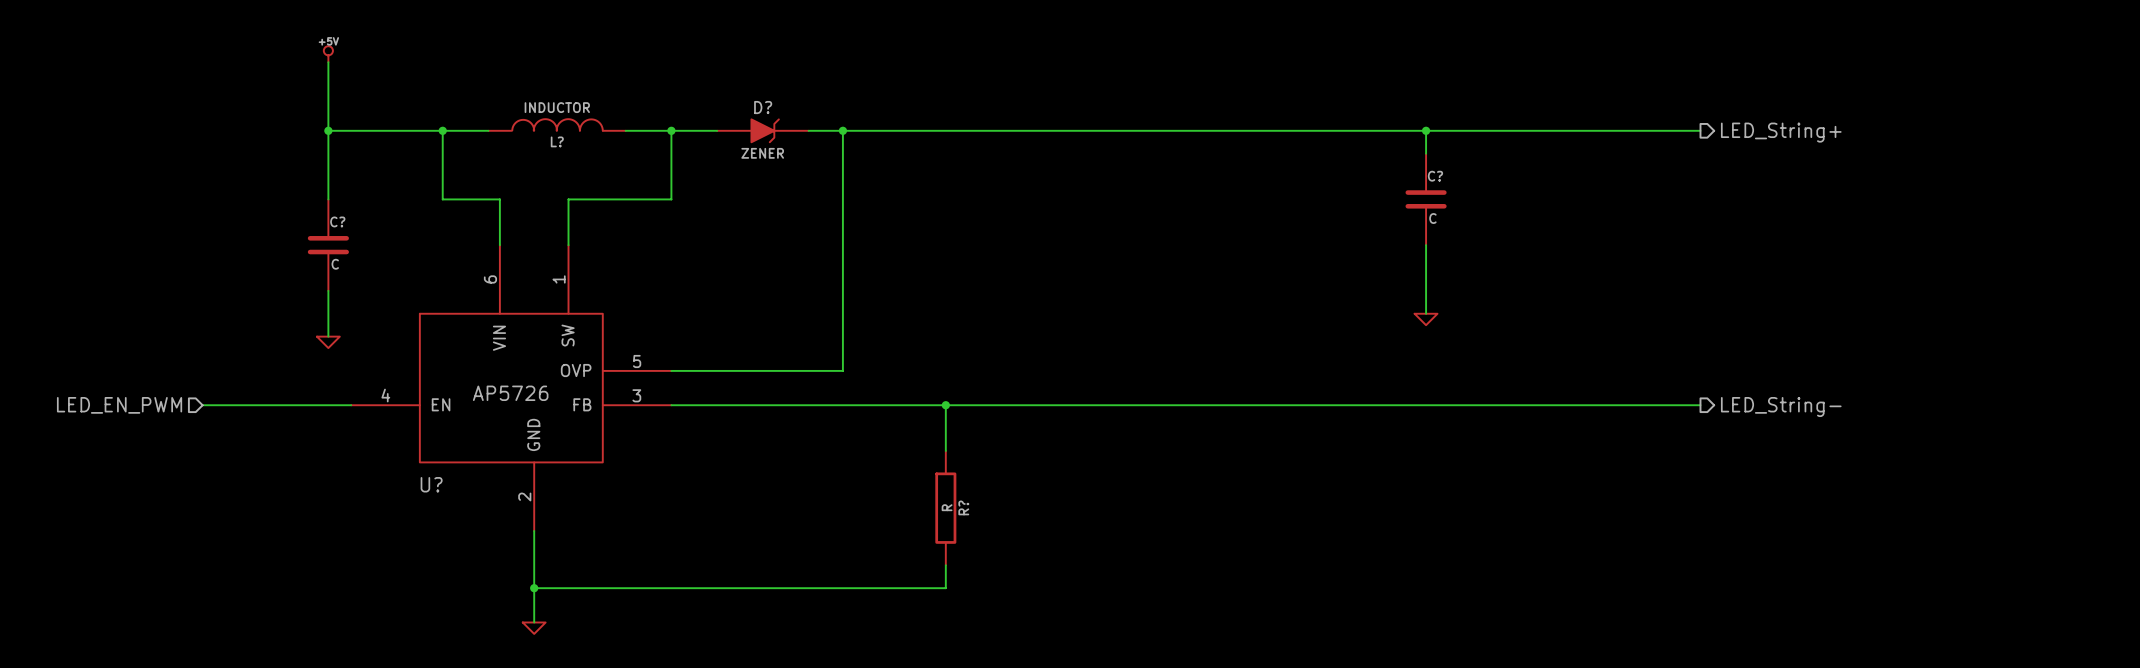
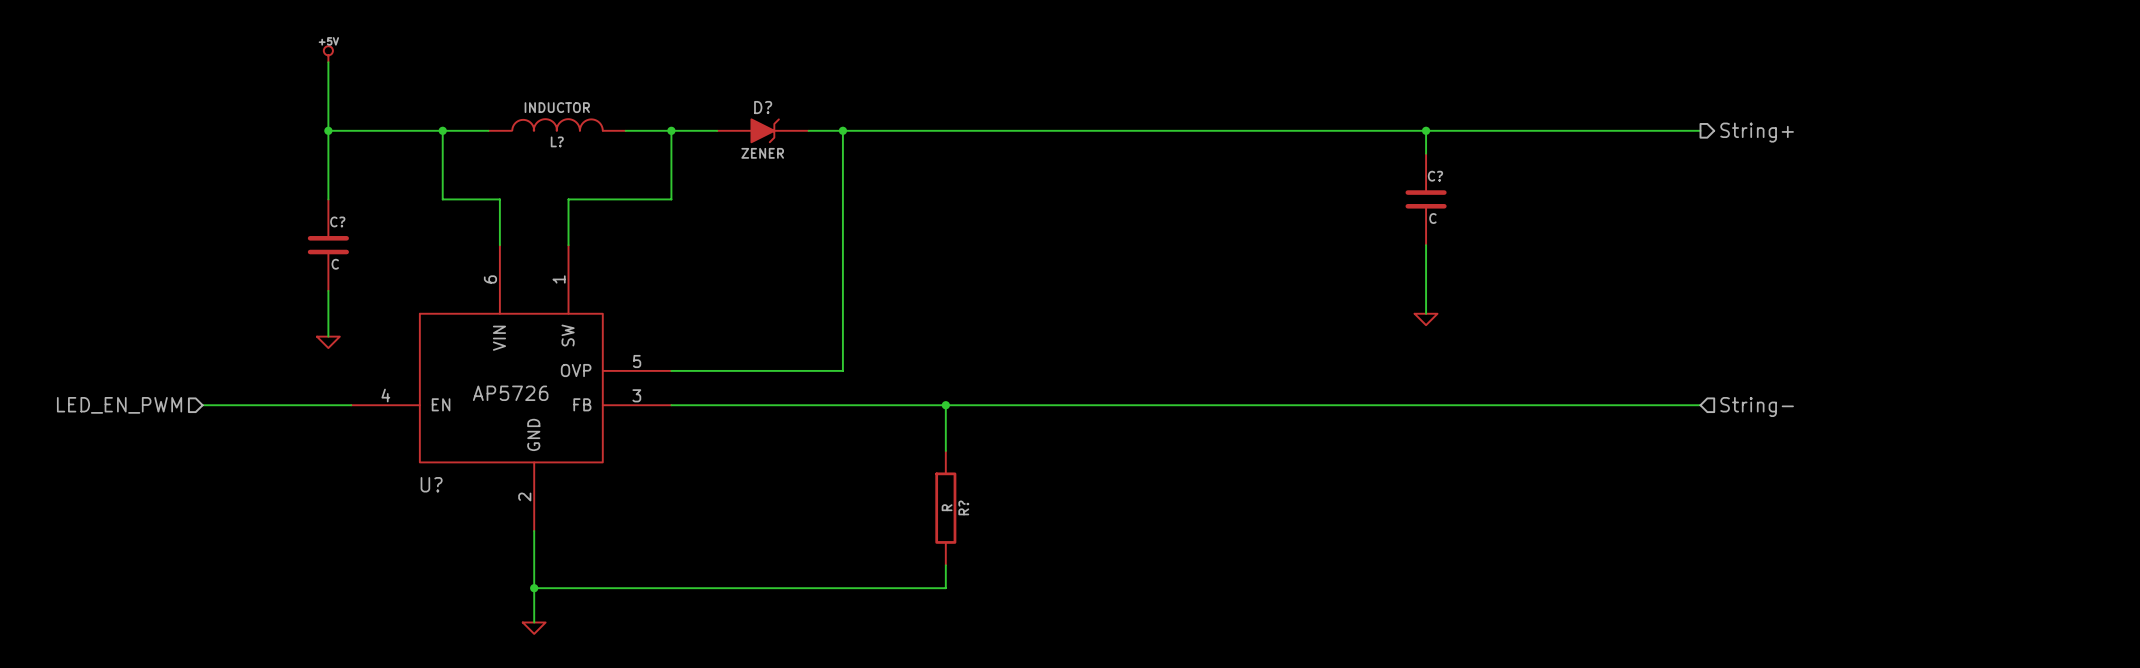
hierarchical label: LED_String+ (1781, 132) -> String+ (1757, 132)
hierarchical label shape: output (1781, 407) -> input (1757, 407)
hierarchical label: LED_String- (1781, 407) -> String- (1757, 407)

